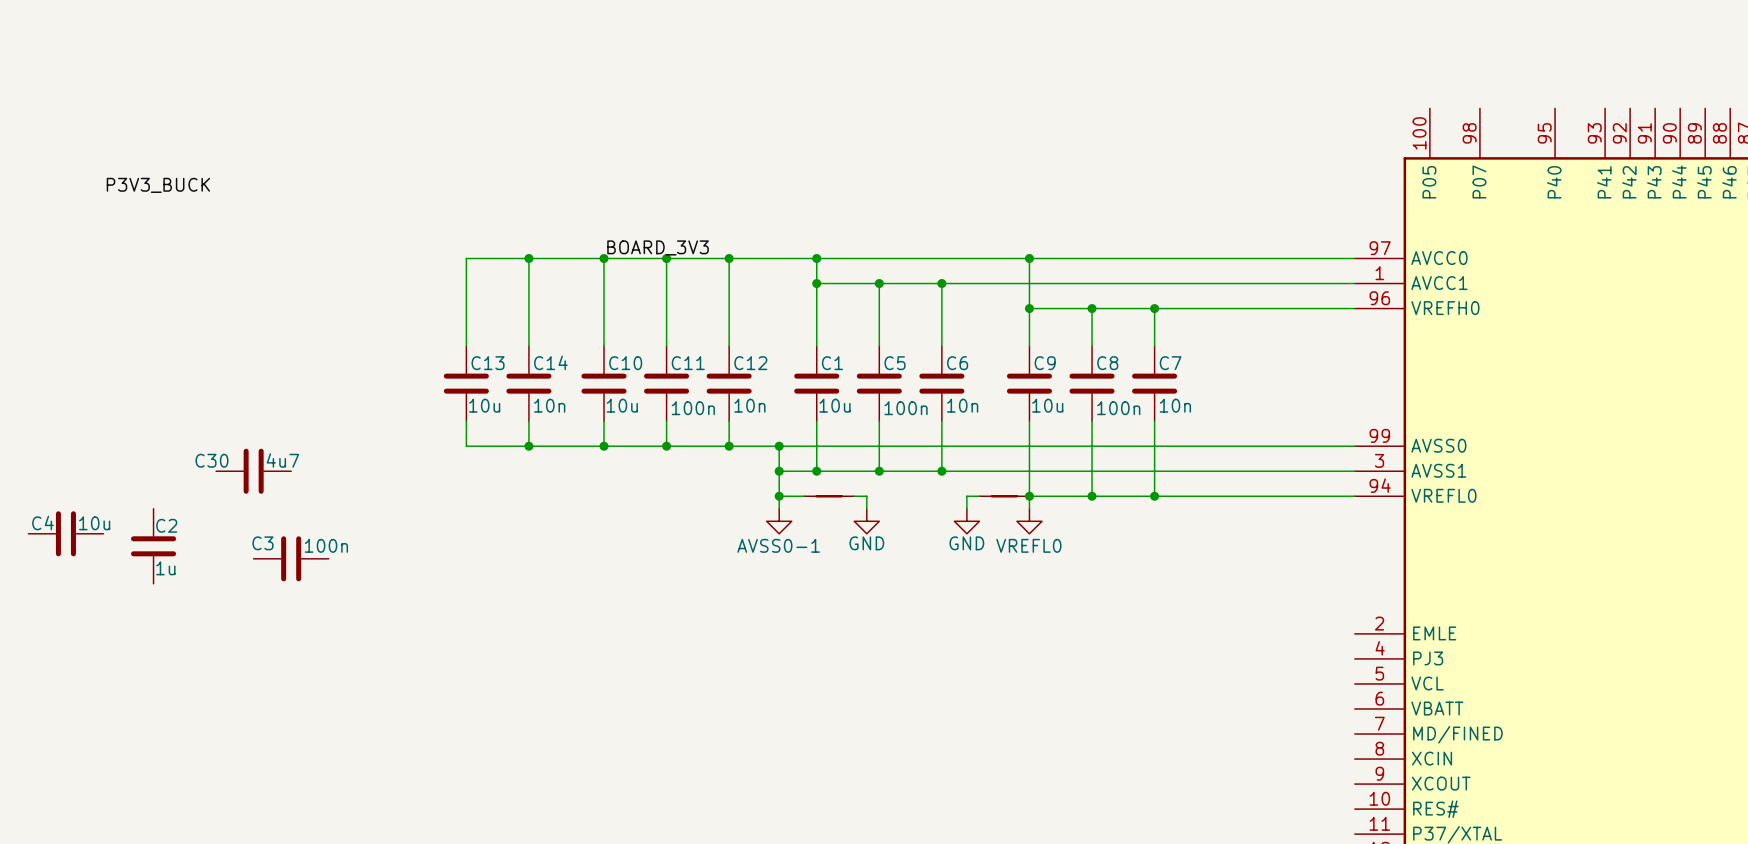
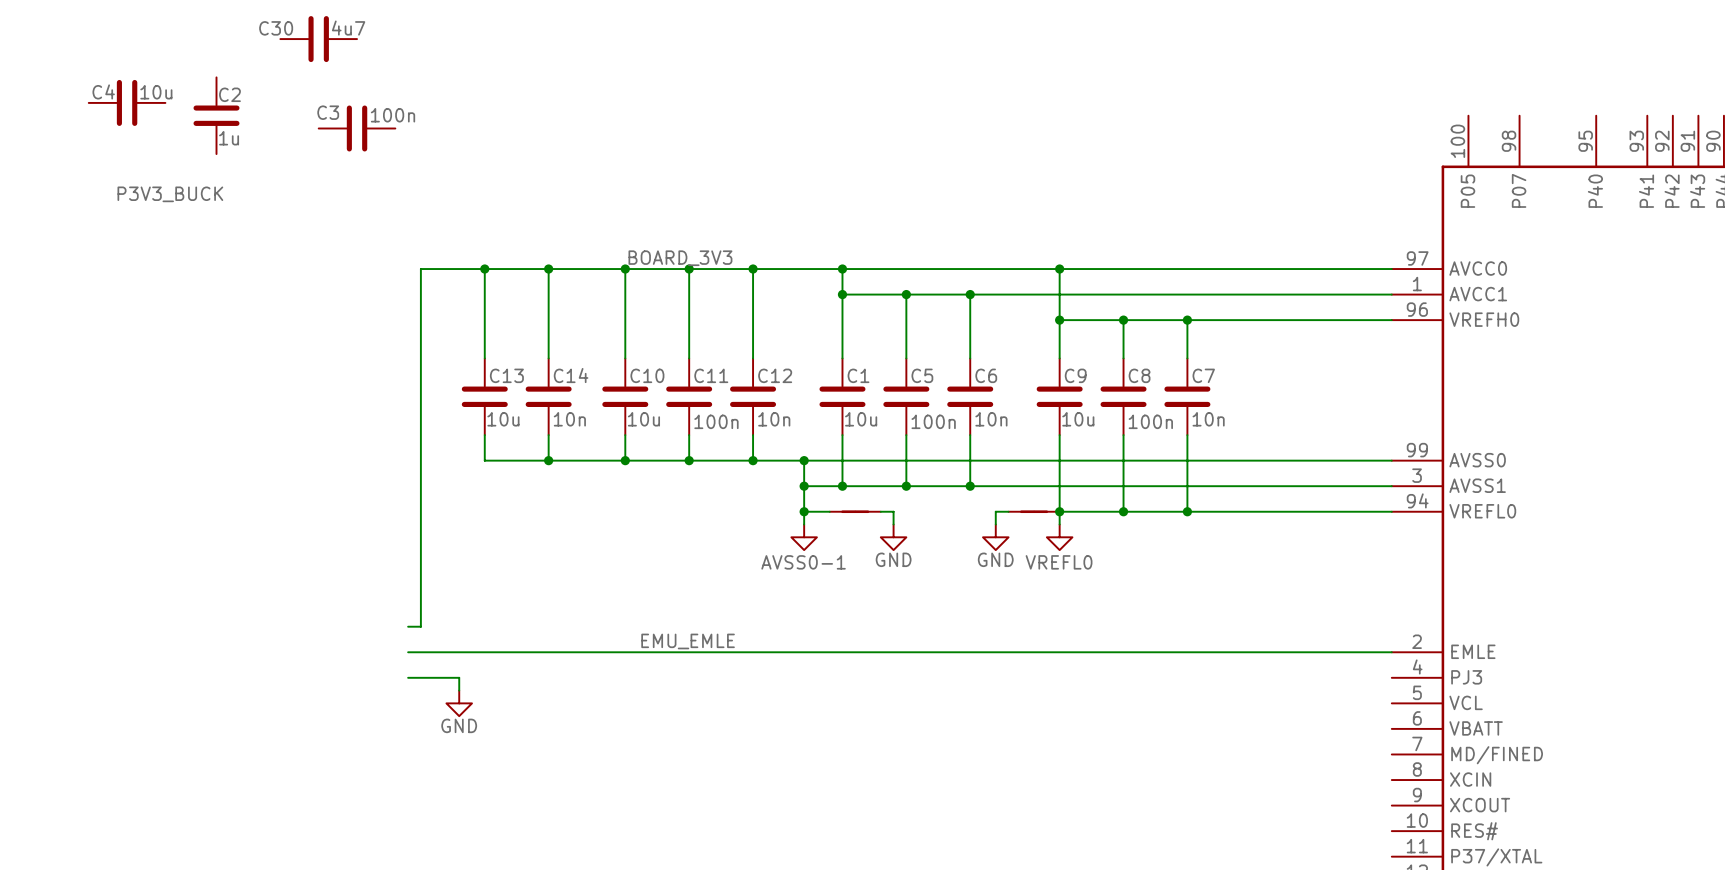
wire: none -> (484, 269) (420, 269) (420, 626) (408, 626)
junction: none -> (484, 269)
C30 position: (253, 471) -> (318, 39)
C4 position: (65, 533) -> (127, 102)
C2 position: (153, 546) -> (216, 115)
C3 position: (291, 558) -> (357, 128)
label: none -> EMU_EMLE (688, 641)
wire: none -> (408, 652) (1391, 652)
wire: none -> (408, 677) (459, 677) (459, 690)
power symbol: none -> GND (459, 703)

